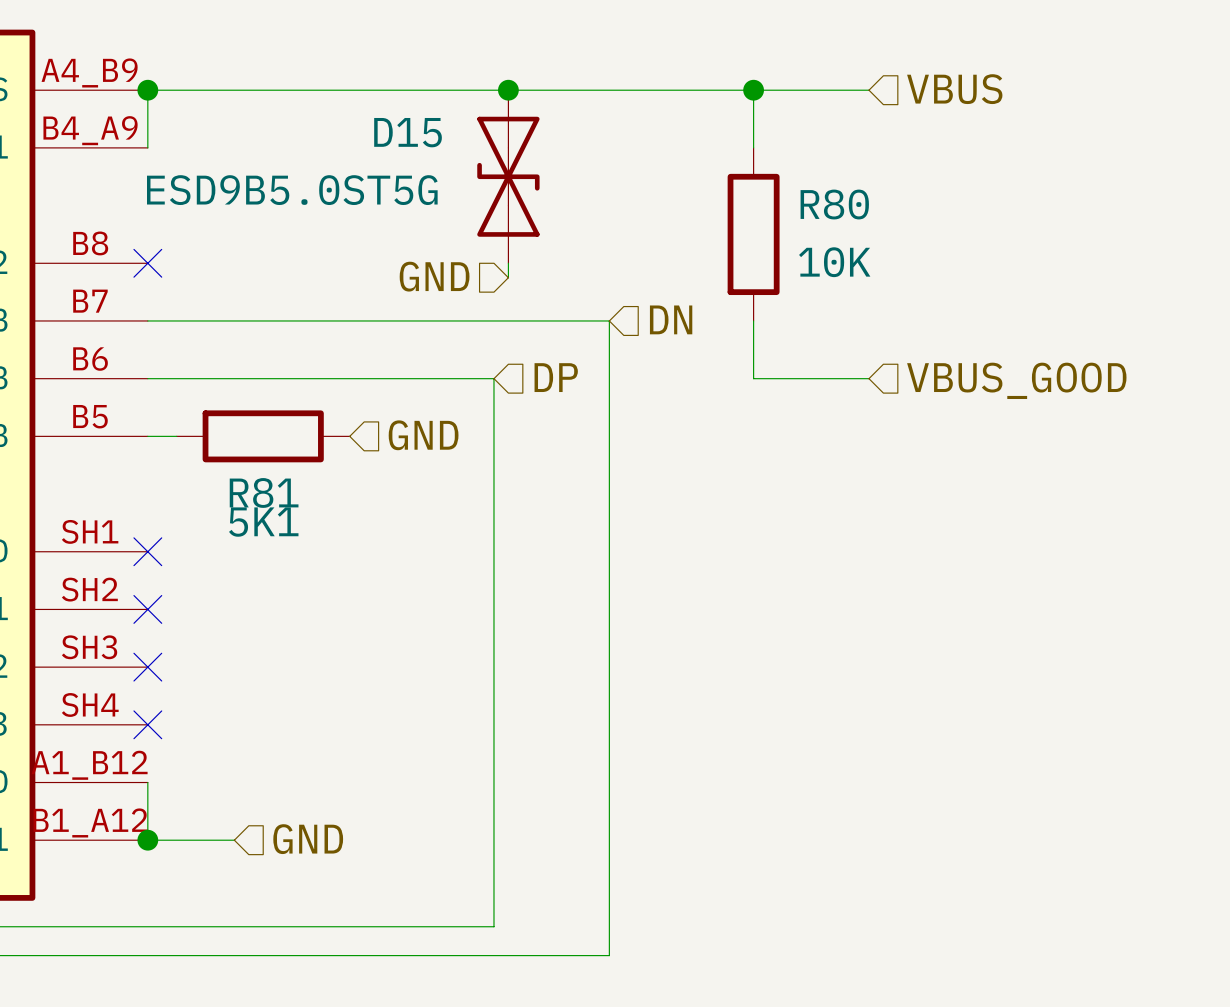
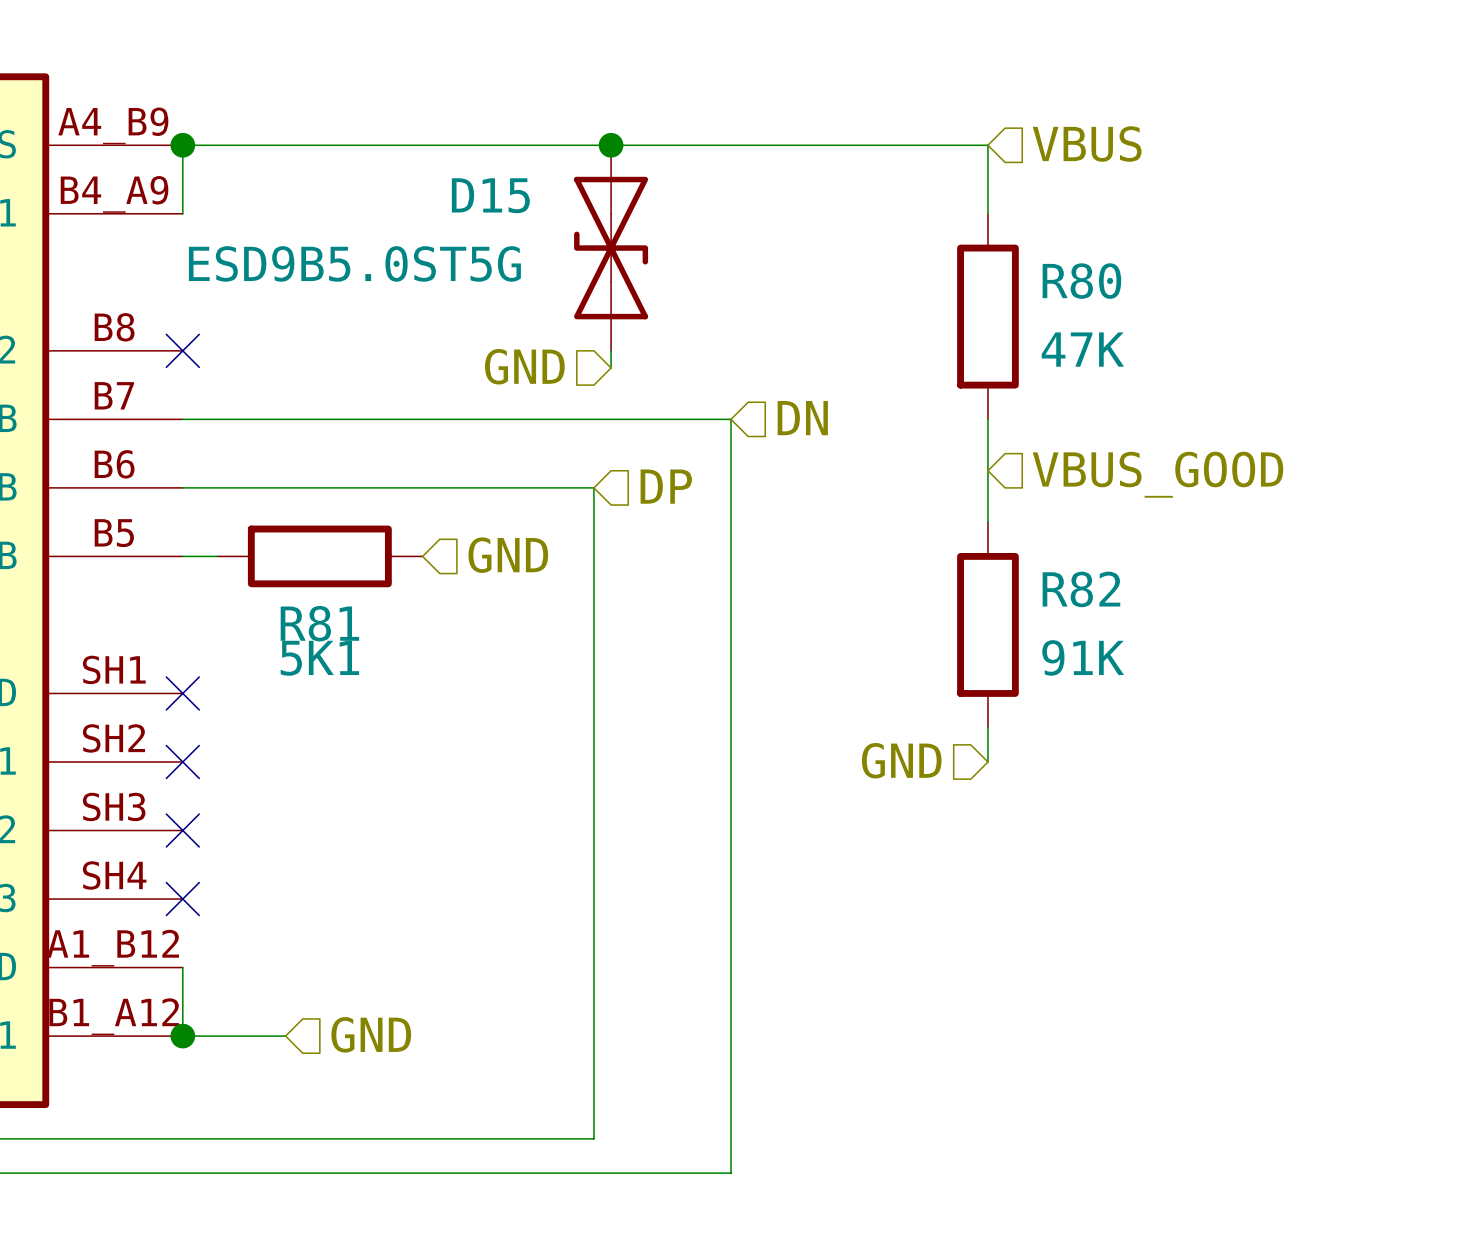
hierarchical label position: VBUS (954, 89) -> VBUS (1087, 144)
wire: (753, 90) (753, 147) -> none
junction: (753, 90) -> none
wire: (825, 90) (868, 90) -> (987, 145) (987, 213)
R80 position: (753, 234) -> (987, 316)
R80 value: 10K (834, 262) -> 47K (1082, 349)
wire: (753, 320) (753, 378) (868, 378) -> none
wire: none -> (987, 419) (987, 522)
hierarchical label position: VBUS_GOOD (1016, 380) -> VBUS_GOOD (1157, 474)
R82: none -> 91K (987, 624)
wire: none -> (987, 727) (987, 761)
hierarchical label: none -> GND (901, 760)

